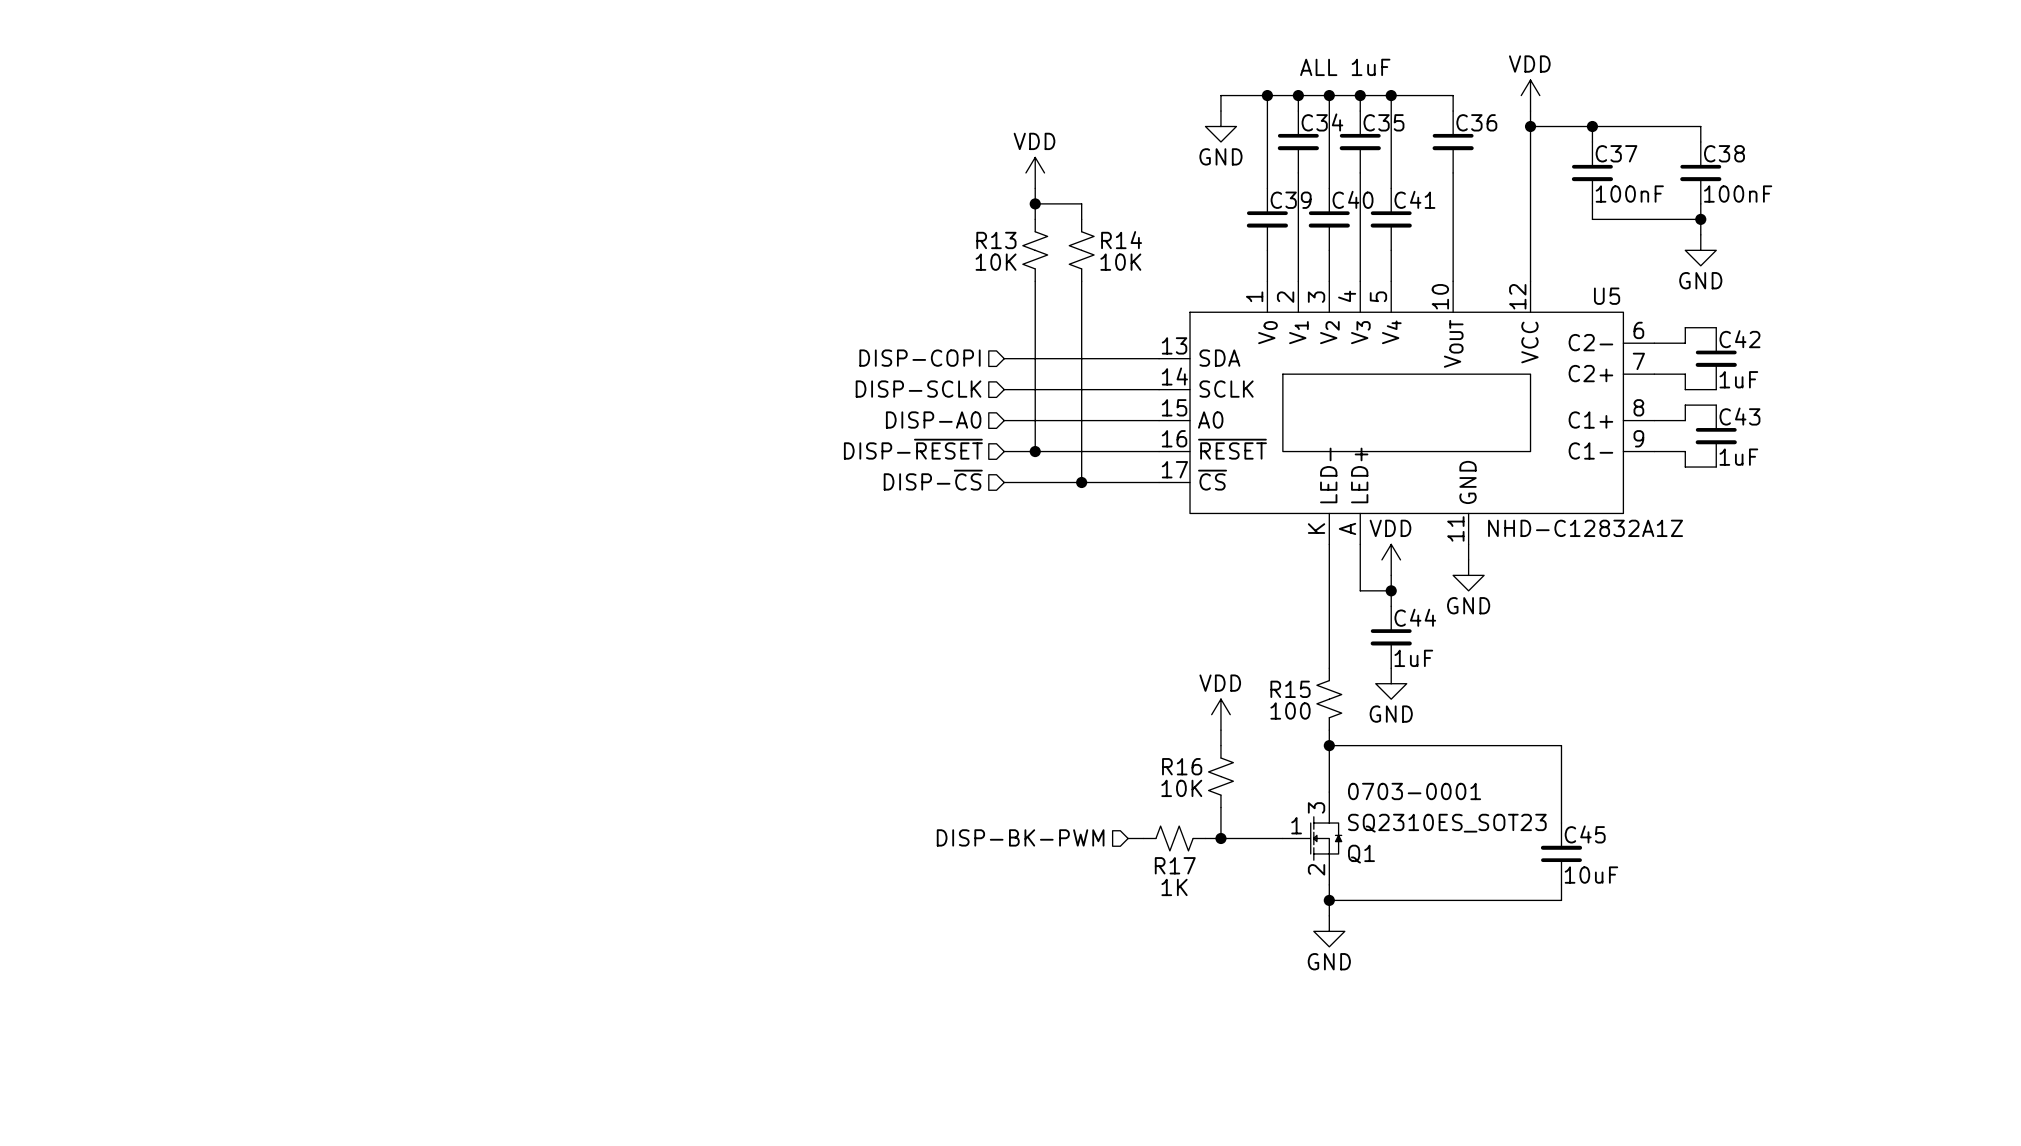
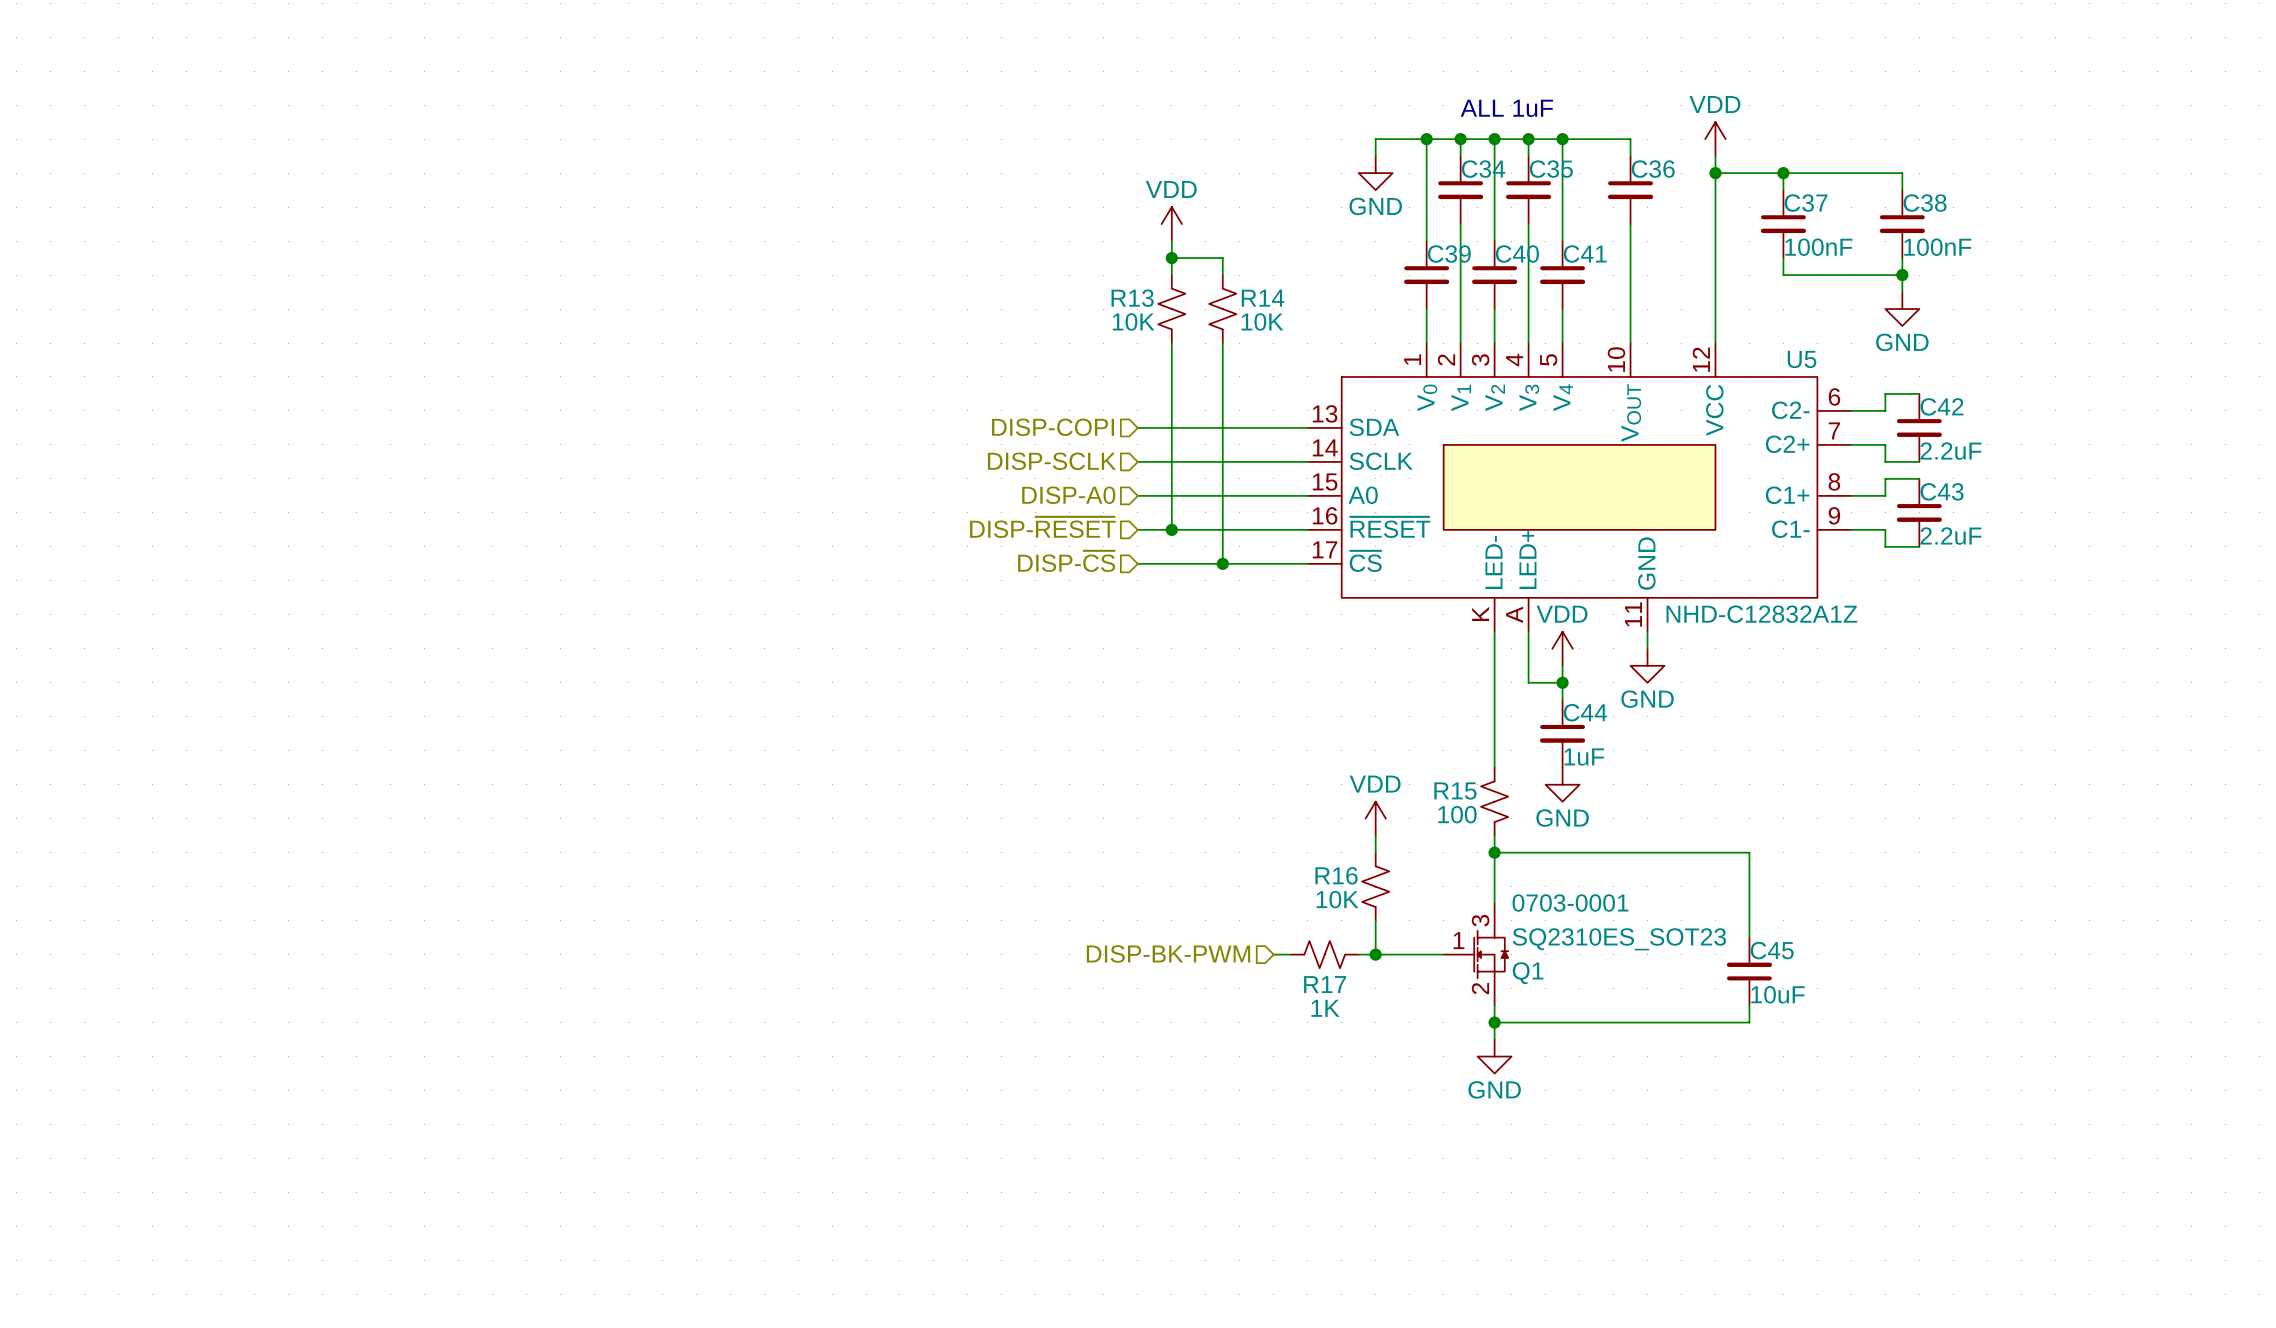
C42 value: 1uF (1738, 379) -> 2.2uF (1951, 451)
C43 value: 1uF (1738, 457) -> 2.2uF (1951, 536)

